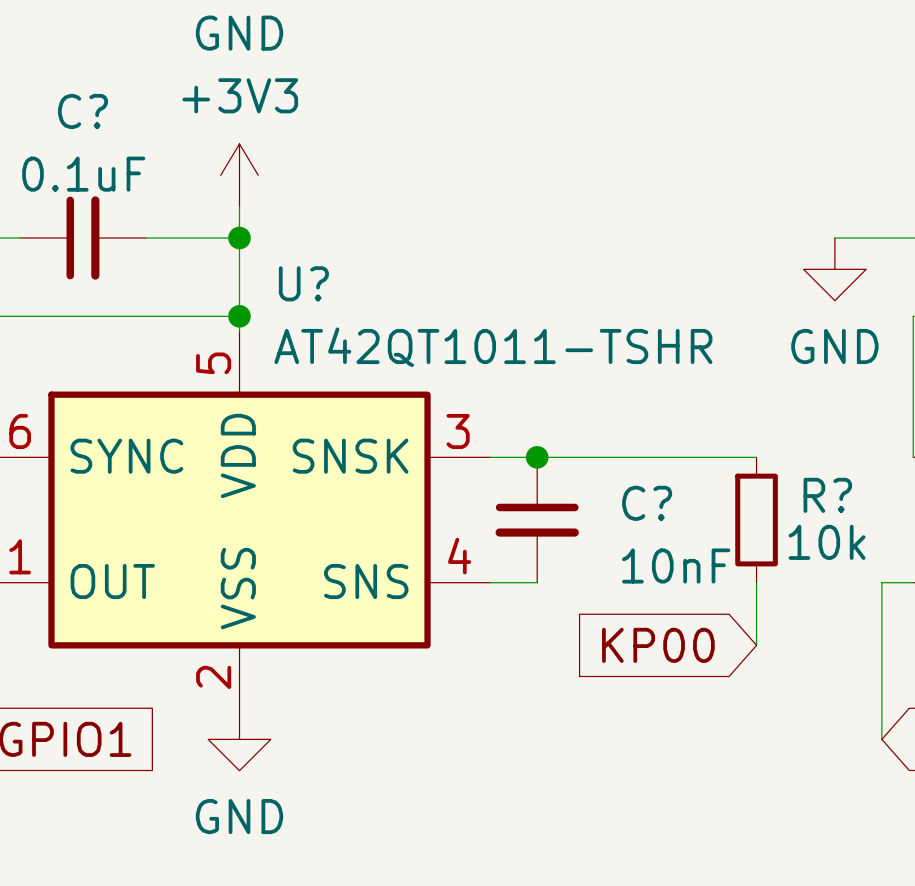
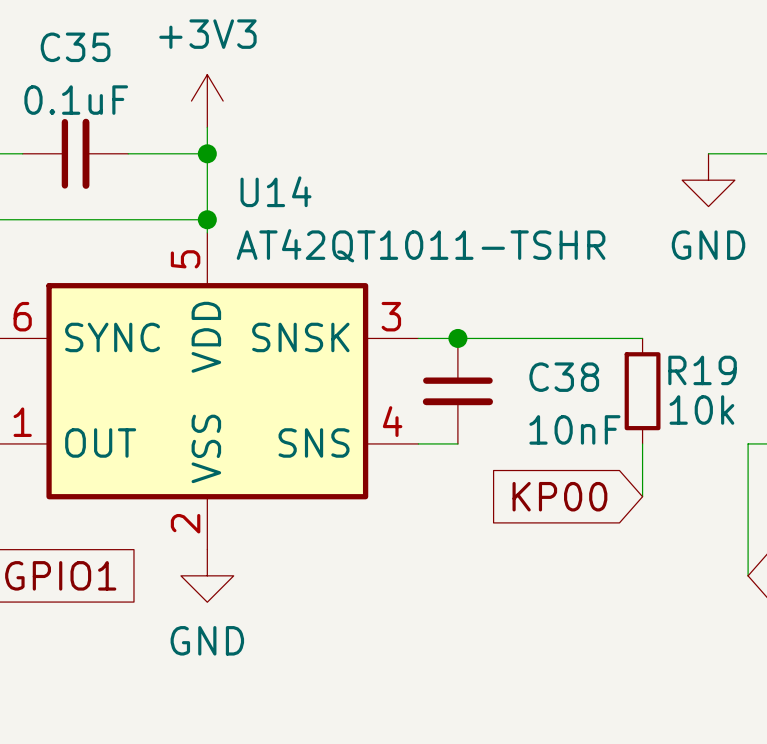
C? name: C? (82, 111) -> C35 (75, 47)
U? name: U? (303, 283) -> U14 (275, 191)
R? name: R? (827, 495) -> R19 (702, 370)
C? name: C? (647, 503) -> C38 (564, 377)

